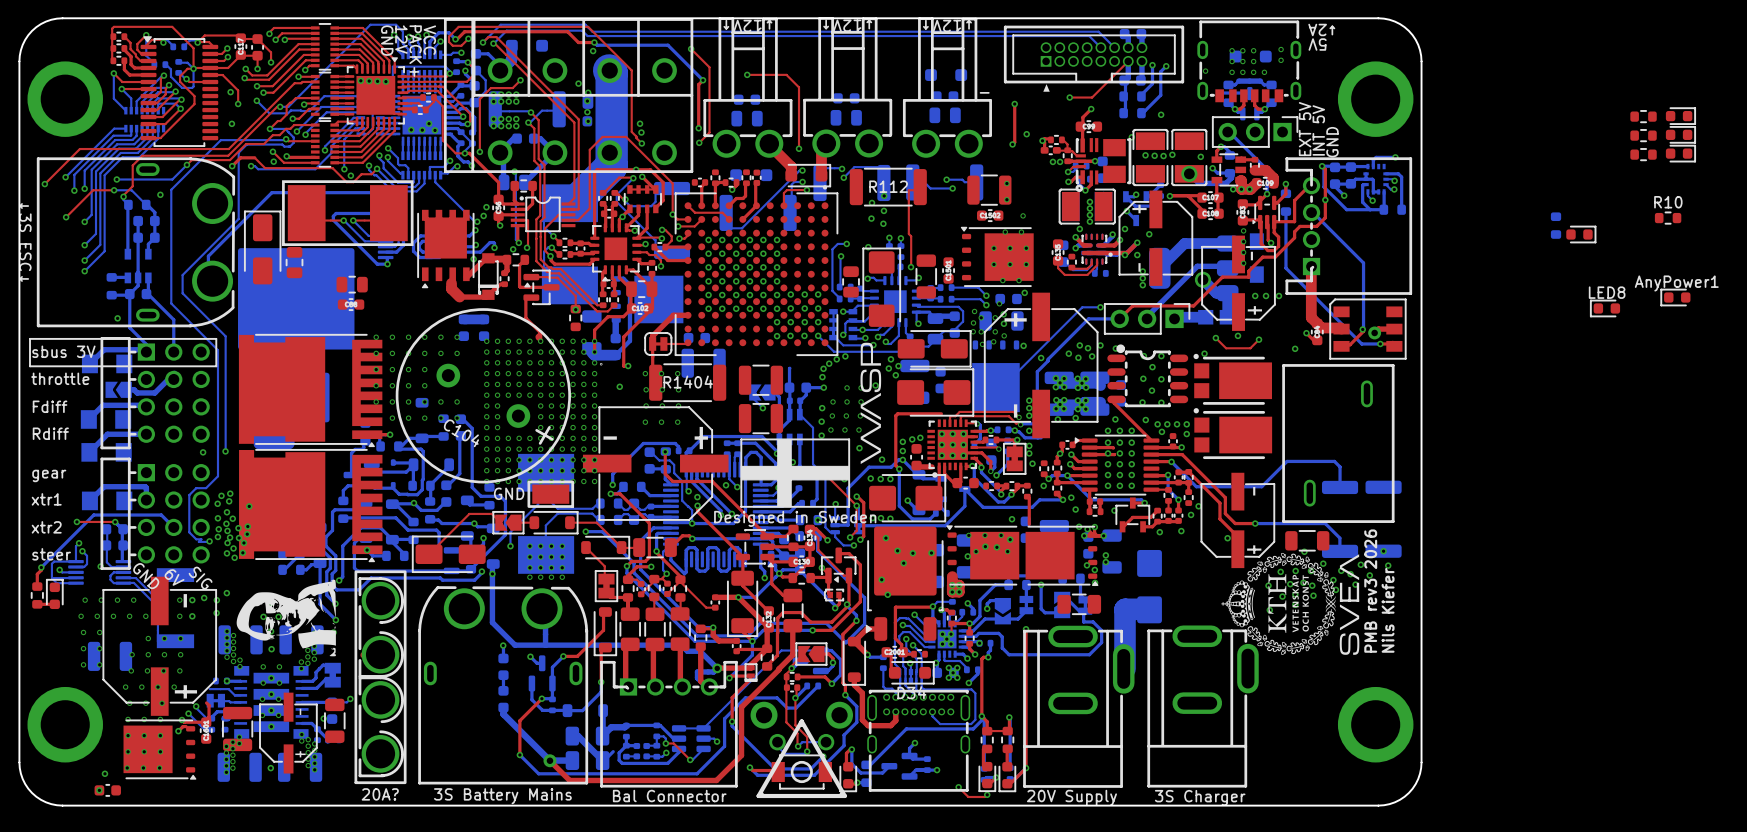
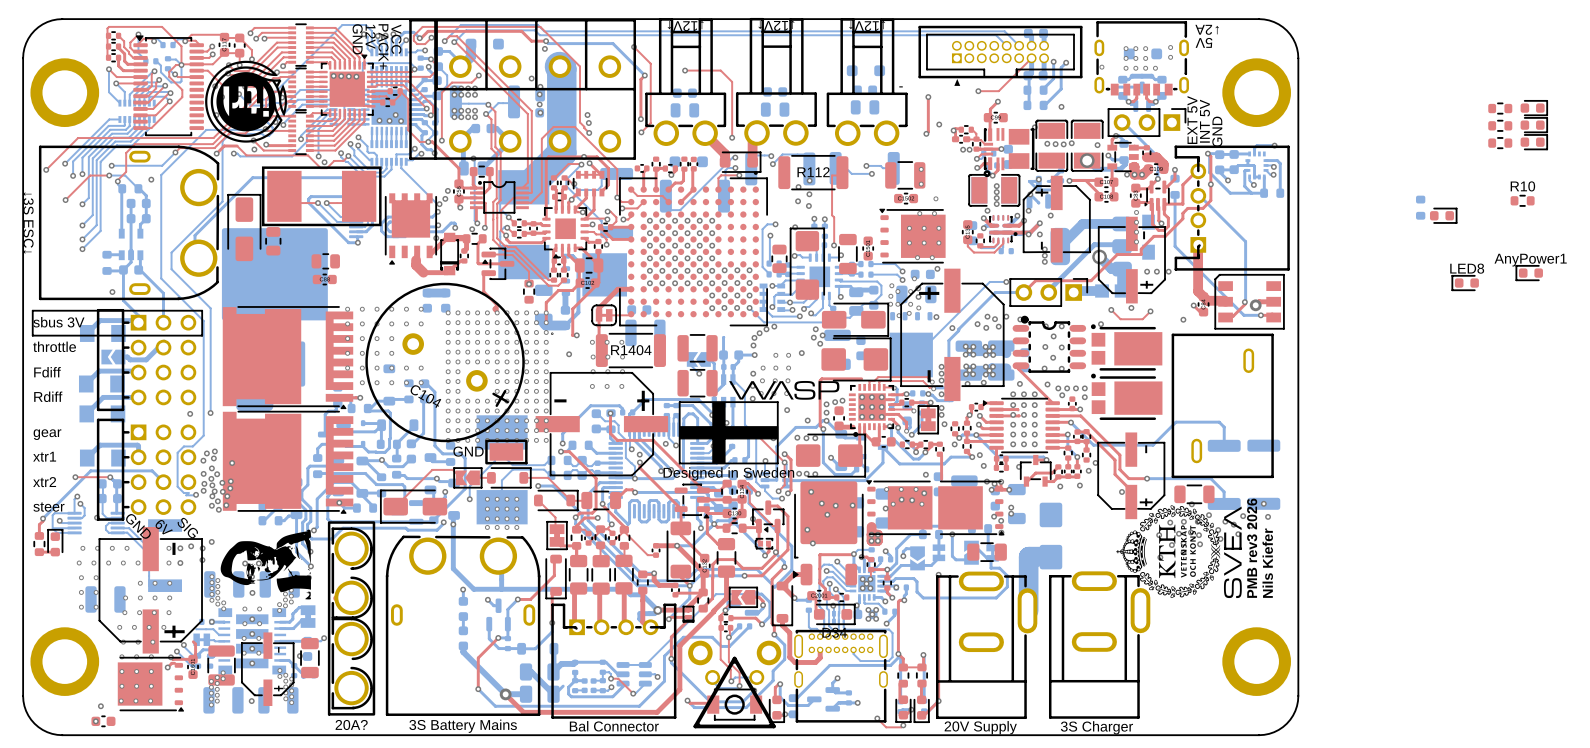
drawing: none -> [205, 60, 287, 143]
part footprint: [1123, 191, 1150, 227] -> [1026, 175, 1052, 209]
drawing: [860, 342, 882, 465] -> none
drawing: none -> [729, 380, 840, 400]

